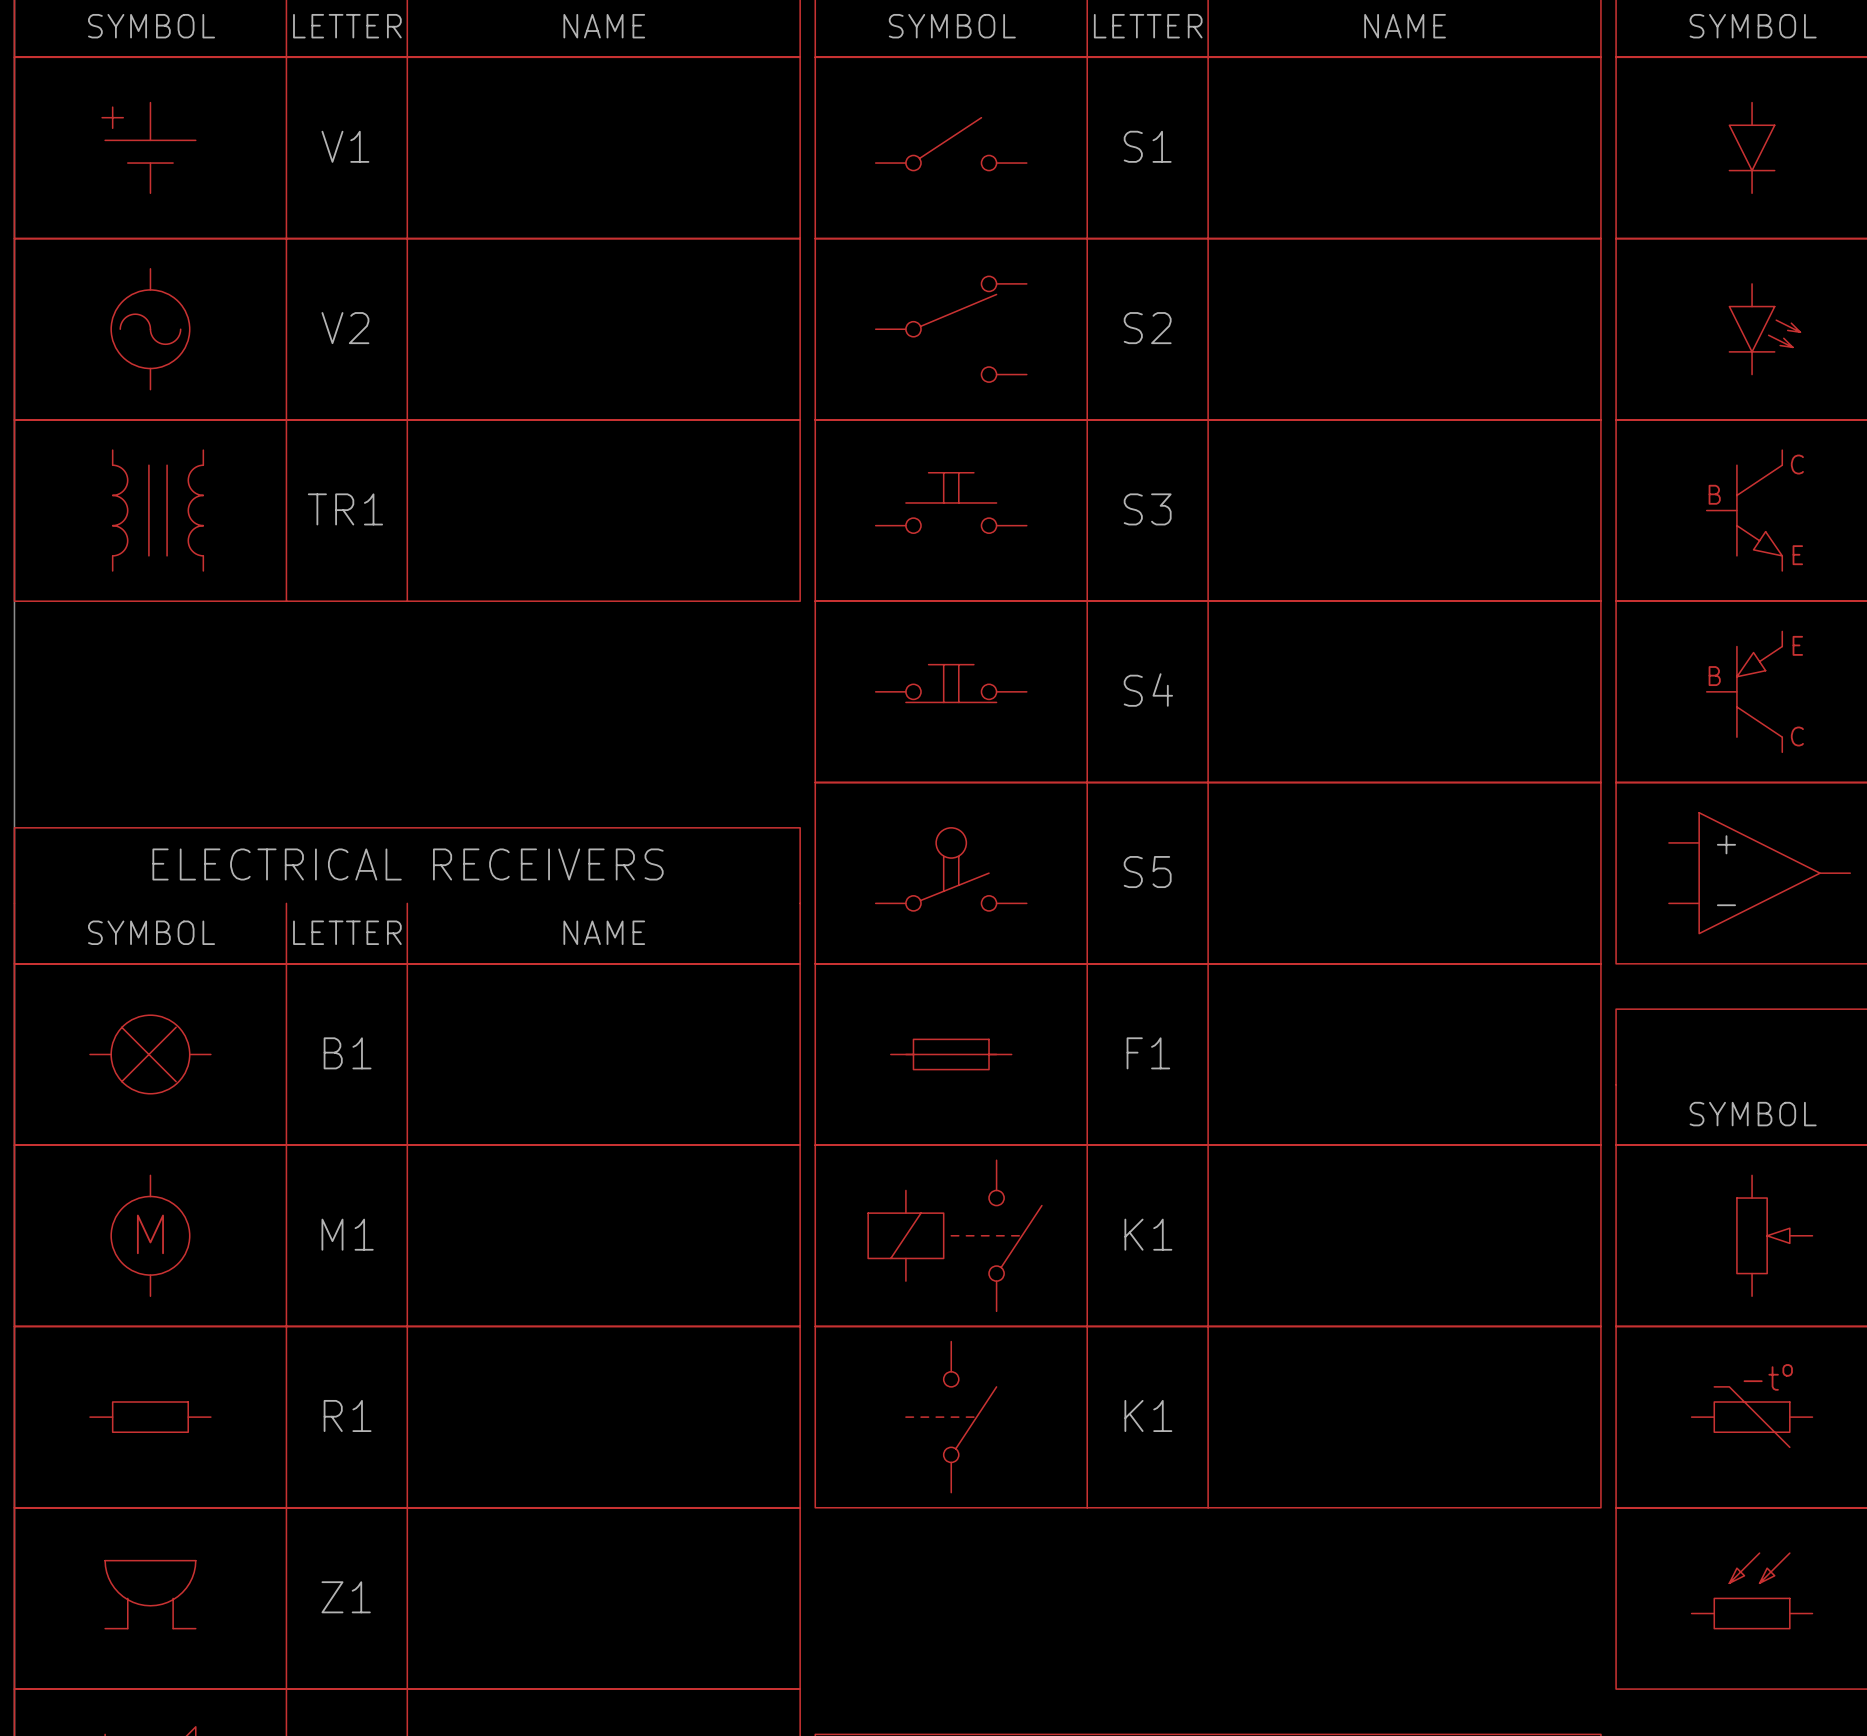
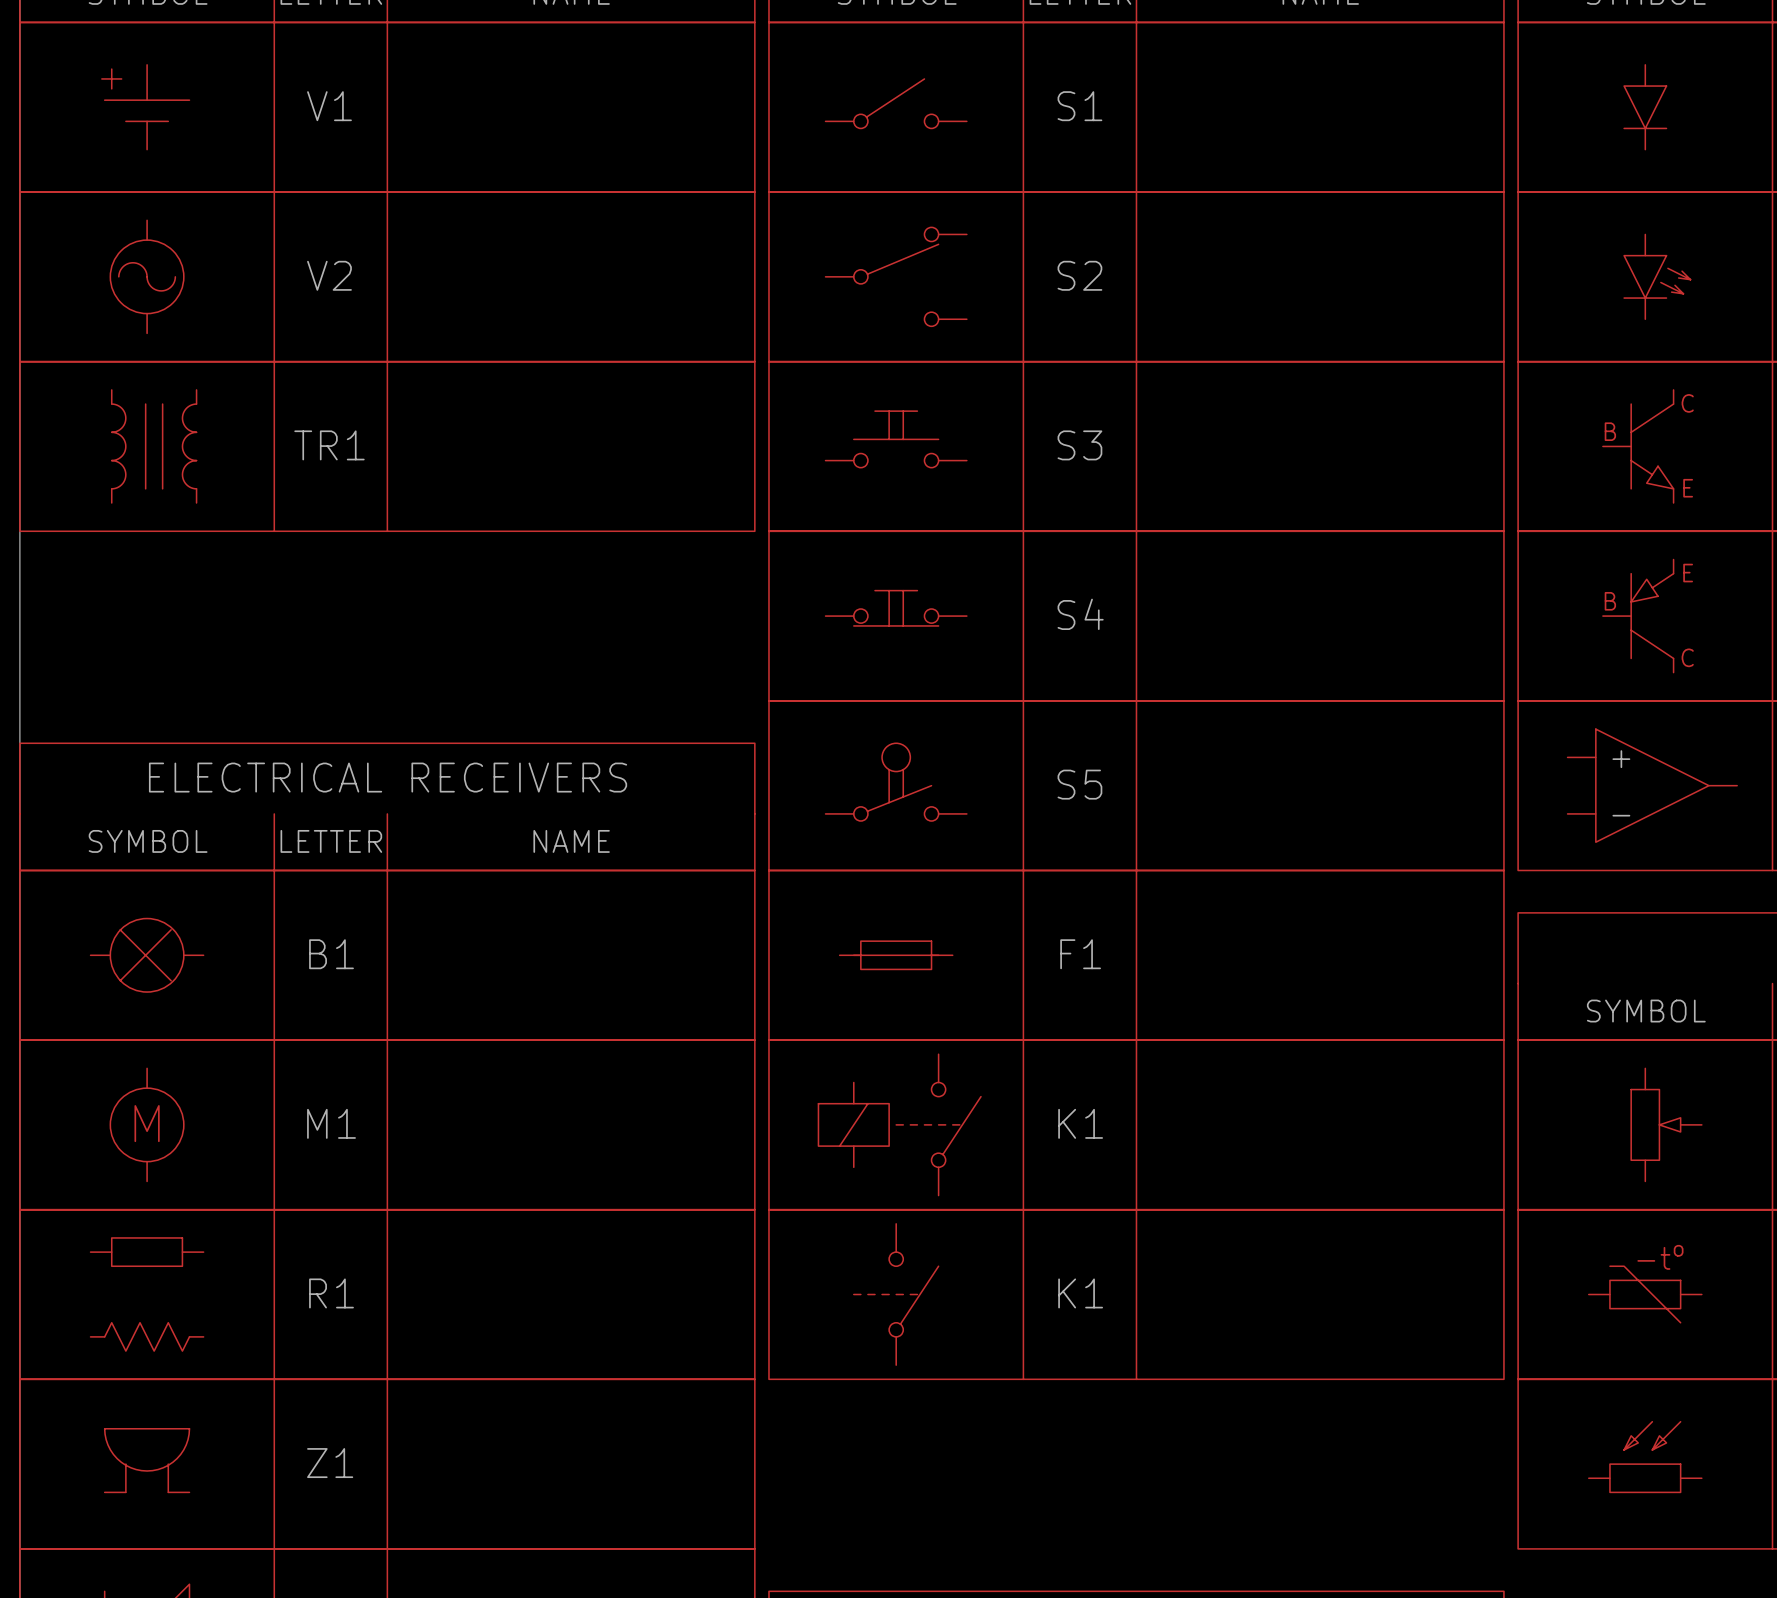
R1 position: (150, 1417) -> (147, 1252)
part: none -> (147, 1336)

